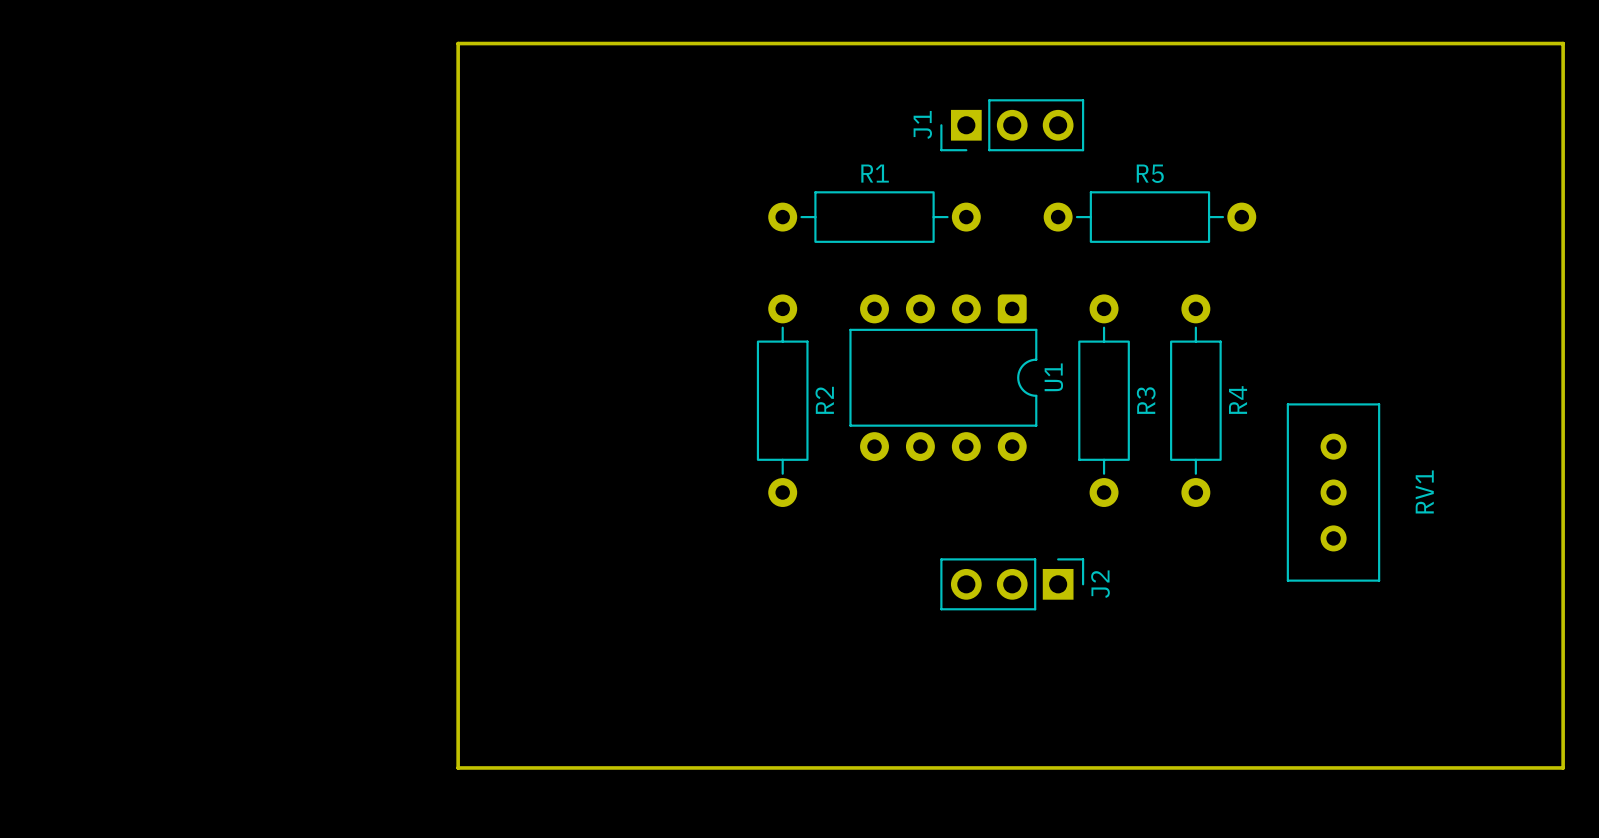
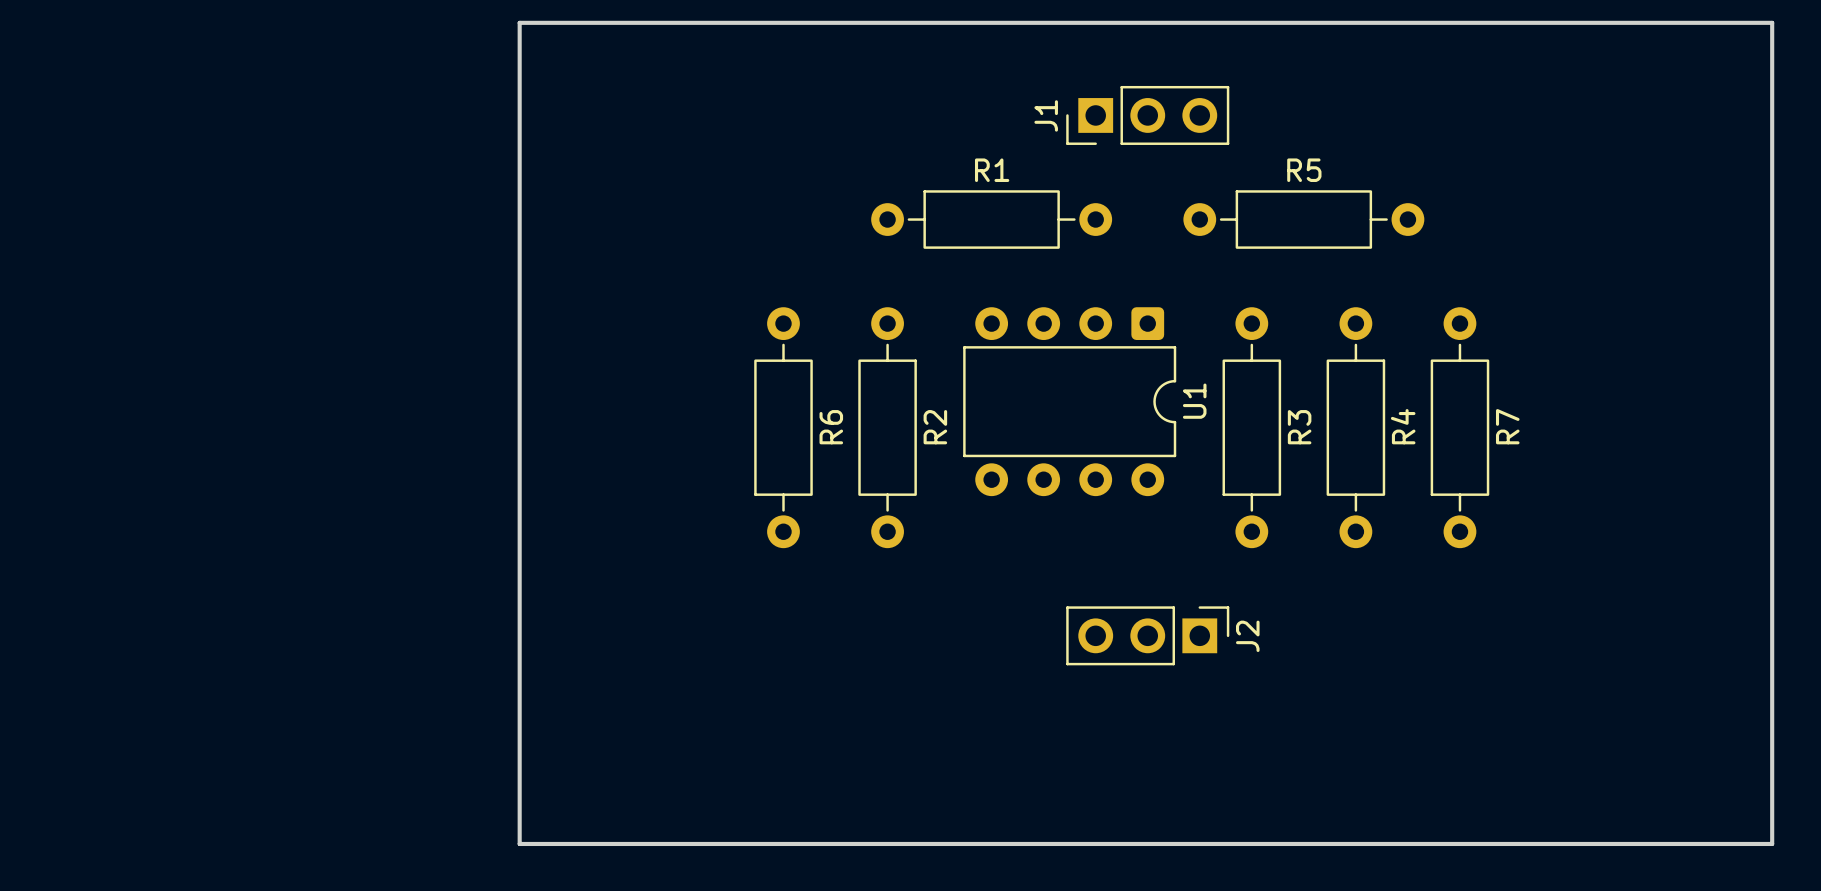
R6: none -> (783, 427)
R7: none -> (1459, 427)
RV1: (1333, 492) -> none

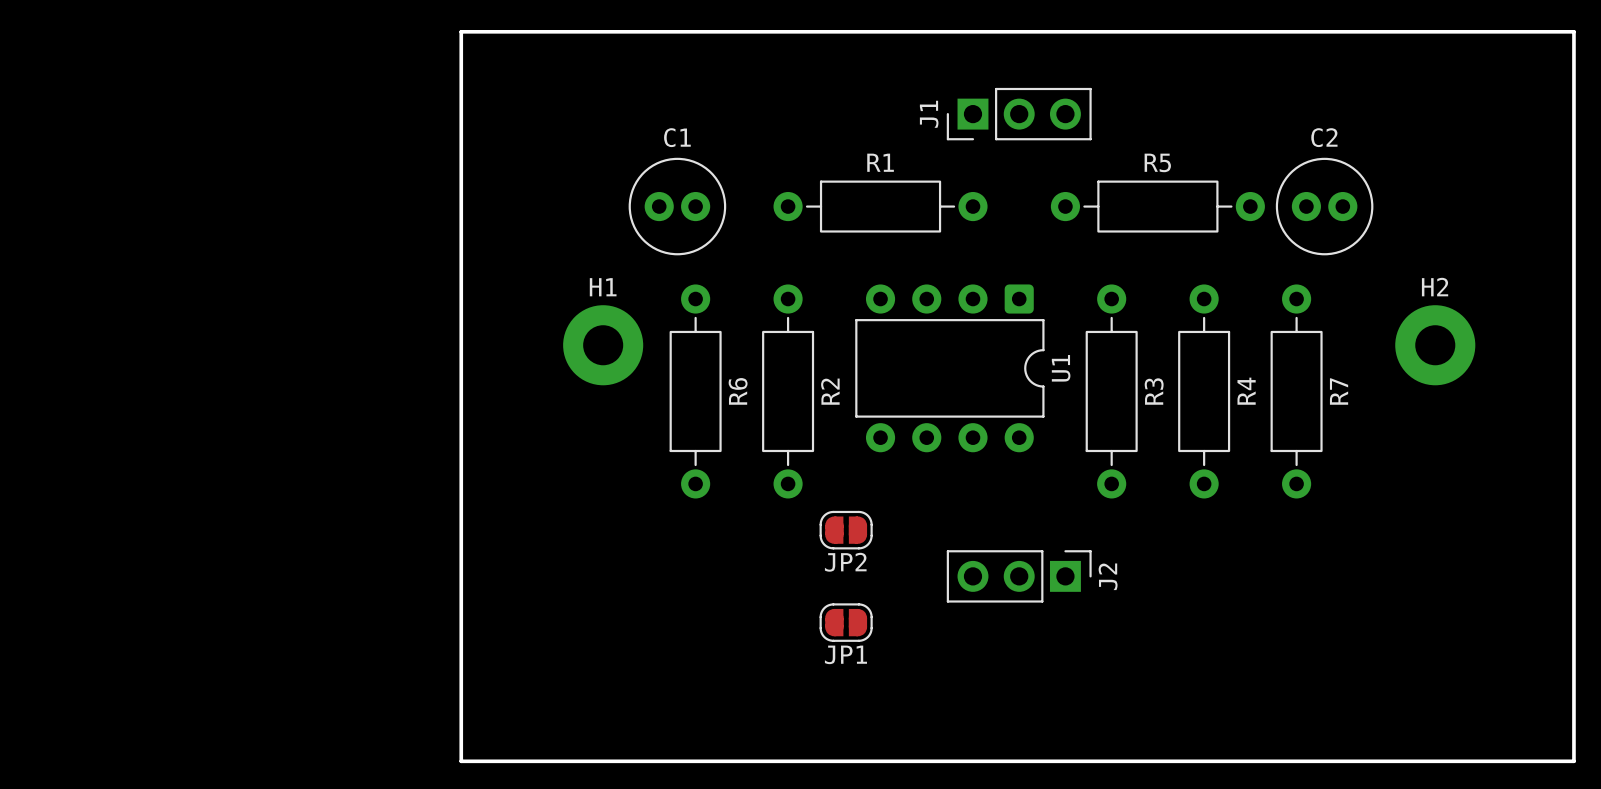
C1: none -> (677, 206)
C2: none -> (1324, 206)
H1: none -> (603, 345)
H2: none -> (1435, 345)
JP2: none -> (846, 530)
JP1: none -> (846, 622)

